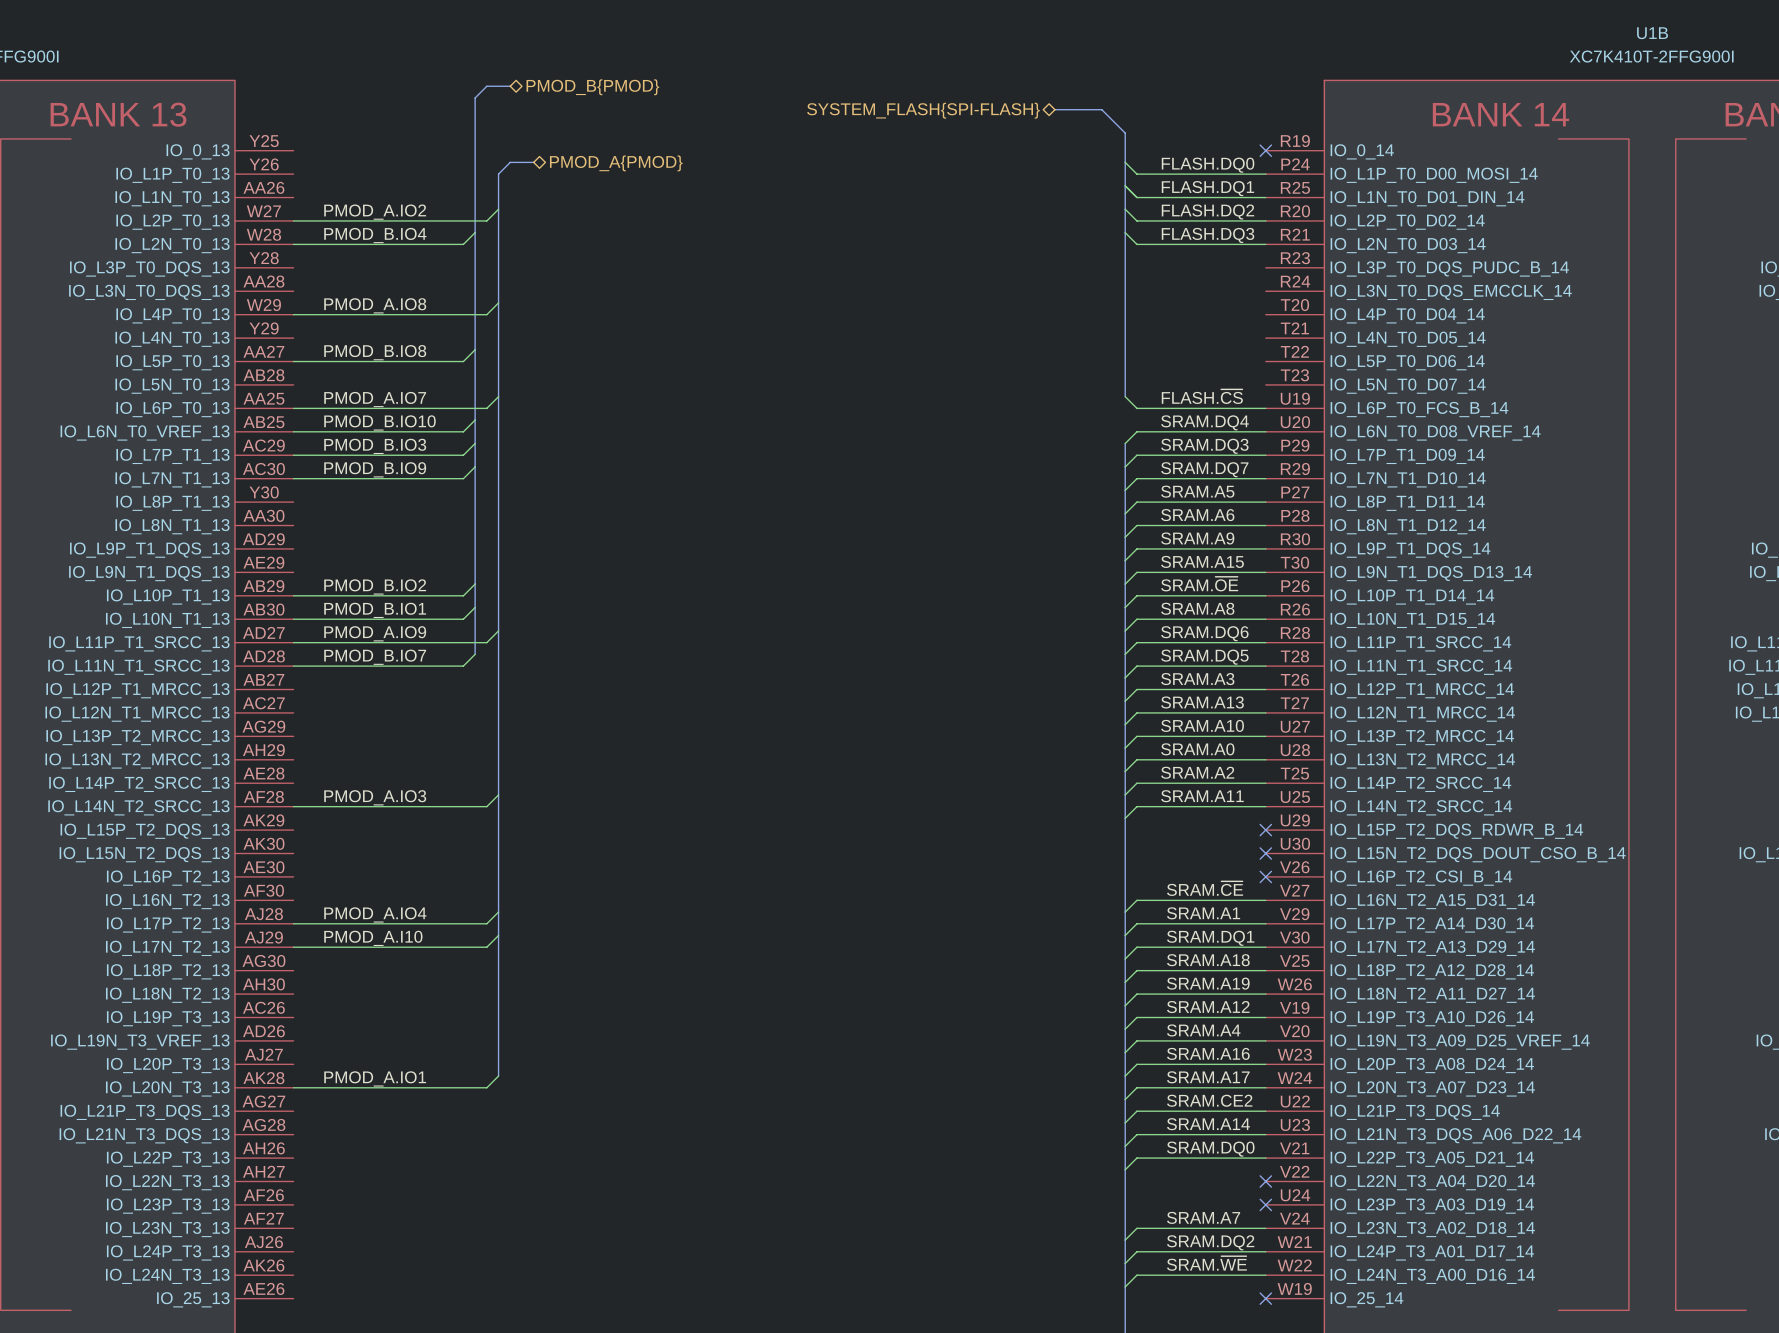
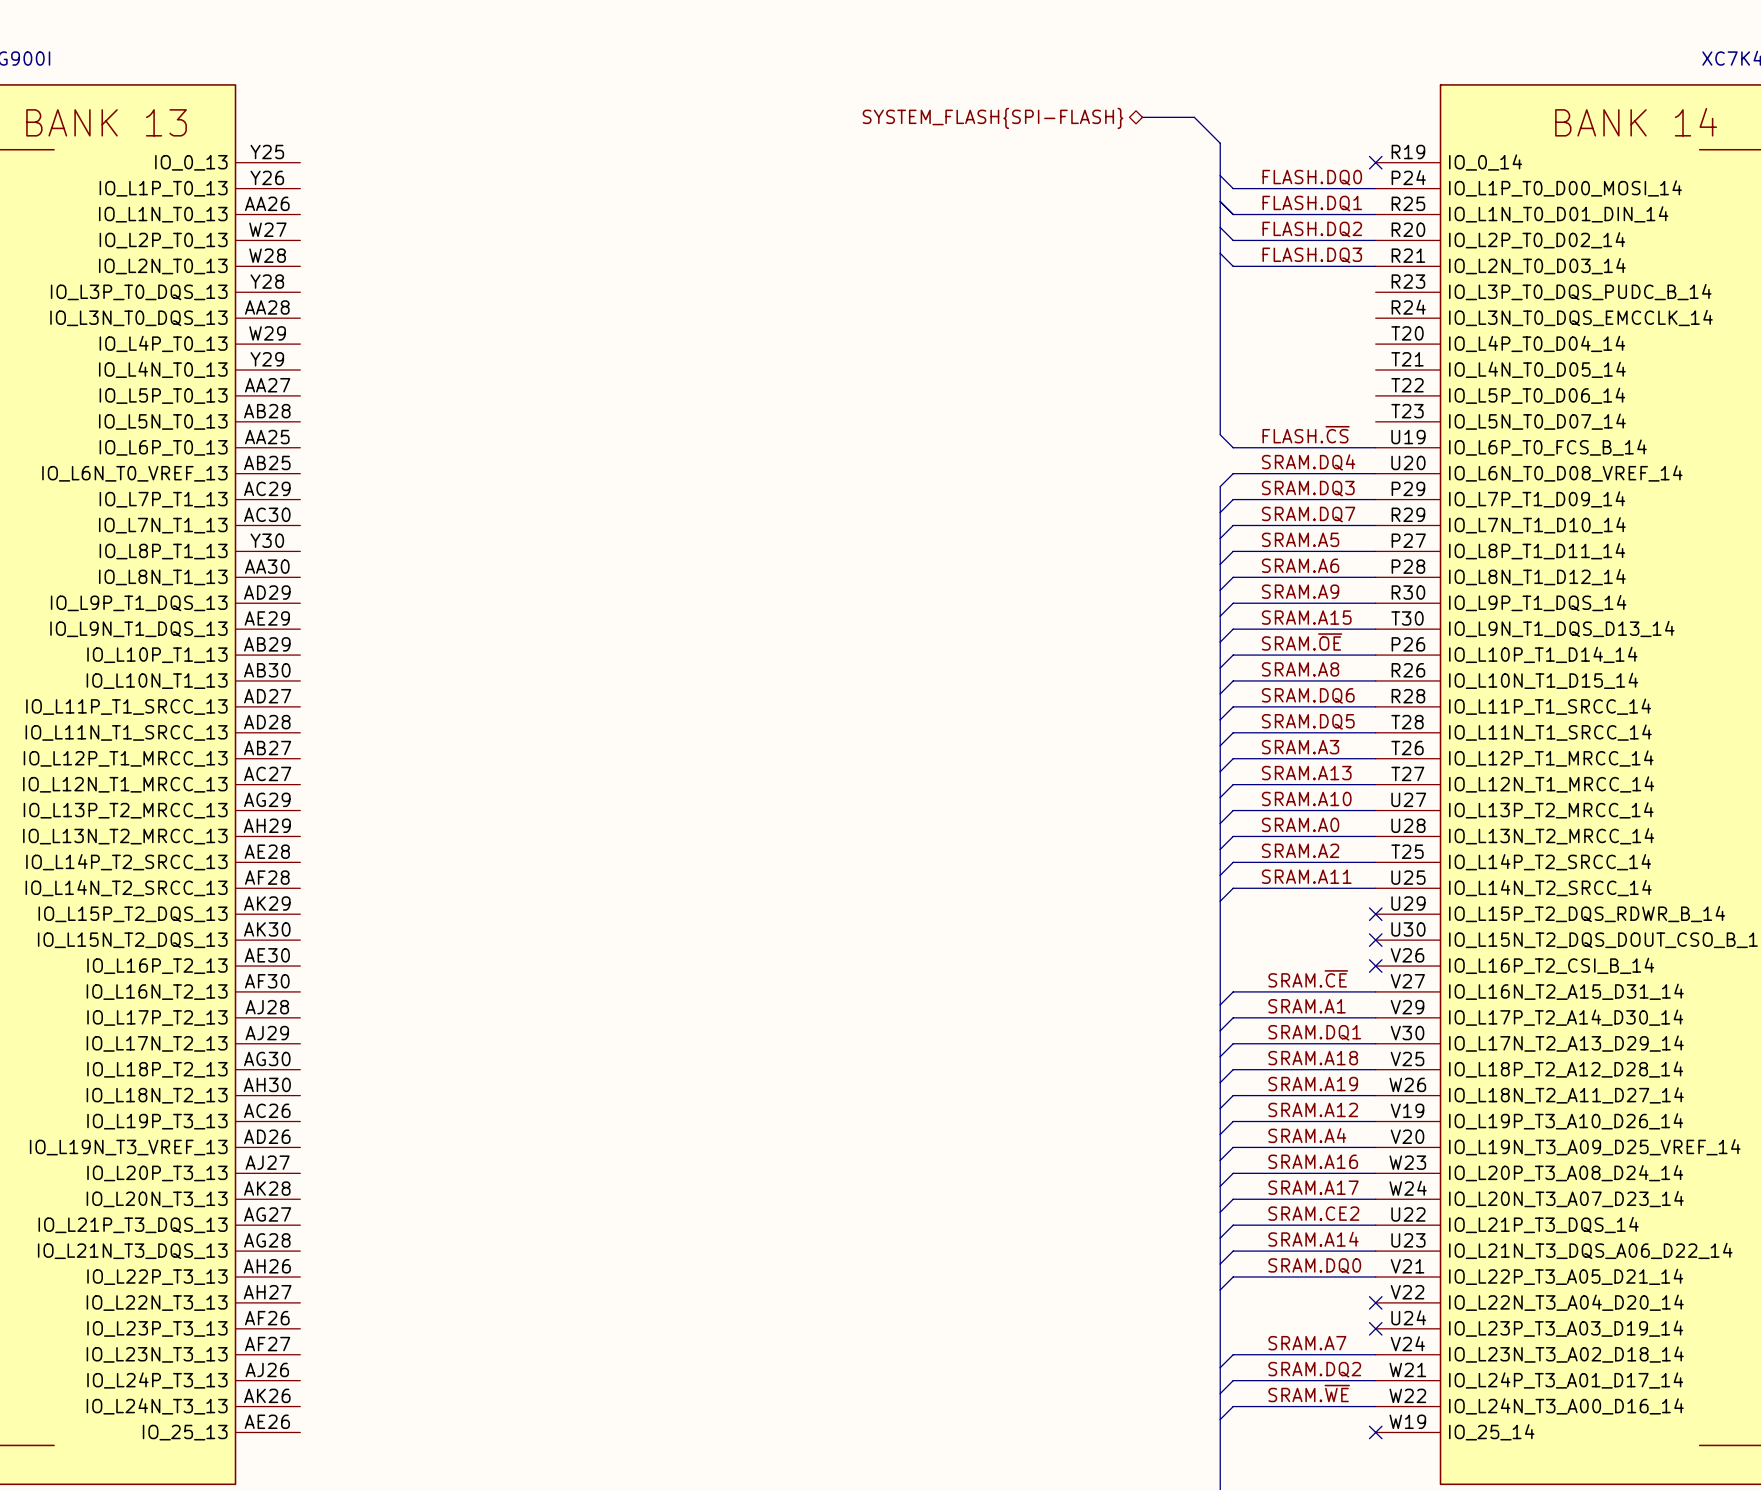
bus: (510, 86) (486, 86) (475, 97) (475, 654) -> none
hierarchical label: PMOD_B{PMOD} (592, 87) -> none
bus: (533, 162) (510, 162) (498, 174) (498, 1076) -> none
hierarchical label: PMOD_A{PMOD} (616, 163) -> none
wire: (498, 209) (486, 220) (293, 220) -> none
label: PMOD_A.IO2 (375, 212) -> none
wire: (475, 232) (463, 244) -> none
label: PMOD_B.IO4 (375, 235) -> none
wire: (293, 244) (463, 244) -> none
wire: (498, 302) (486, 314) (293, 314) -> none
label: PMOD_A.IO8 (375, 305) -> none
wire: (475, 349) (463, 361) -> none
label: PMOD_B.IO8 (375, 352) -> none
wire: (293, 361) (463, 361) -> none
wire: (498, 396) (486, 408) (293, 408) -> none
label: PMOD_A.IO7 (375, 399) -> none
wire: (475, 420) (463, 431) -> none
label: PMOD_B.IO10 (379, 422) -> none
wire: (293, 431) (463, 431) -> none
wire: (475, 443) (463, 455) -> none
label: PMOD_B.IO3 (375, 446) -> none
wire: (293, 455) (463, 455) -> none
wire: (475, 466) (463, 478) -> none
label: PMOD_B.IO9 (375, 469) -> none
wire: (293, 478) (463, 478) -> none
wire: (475, 584) (463, 595) -> none
label: PMOD_B.IO2 (375, 586) -> none
wire: (293, 595) (463, 595) -> none
wire: (475, 607) (463, 619) -> none
label: PMOD_B.IO1 (375, 610) -> none
wire: (293, 619) (463, 619) -> none
wire: (498, 630) (486, 642) (293, 642) -> none
label: PMOD_A.IO9 (375, 633) -> none
wire: (475, 654) (463, 666) -> none
label: PMOD_B.IO7 (375, 657) -> none
wire: (293, 666) (463, 666) -> none
wire: (498, 794) (486, 806) (293, 806) -> none
label: PMOD_A.IO3 (375, 797) -> none
wire: (498, 912) (486, 923) (293, 923) -> none
label: PMOD_A.IO4 (375, 914) -> none
wire: (498, 935) (486, 947) (293, 947) -> none
label: PMOD_A.I10 (373, 938) -> none
wire: (498, 1076) (486, 1087) (293, 1087) -> none
label: PMOD_A.IO1 (375, 1078) -> none

